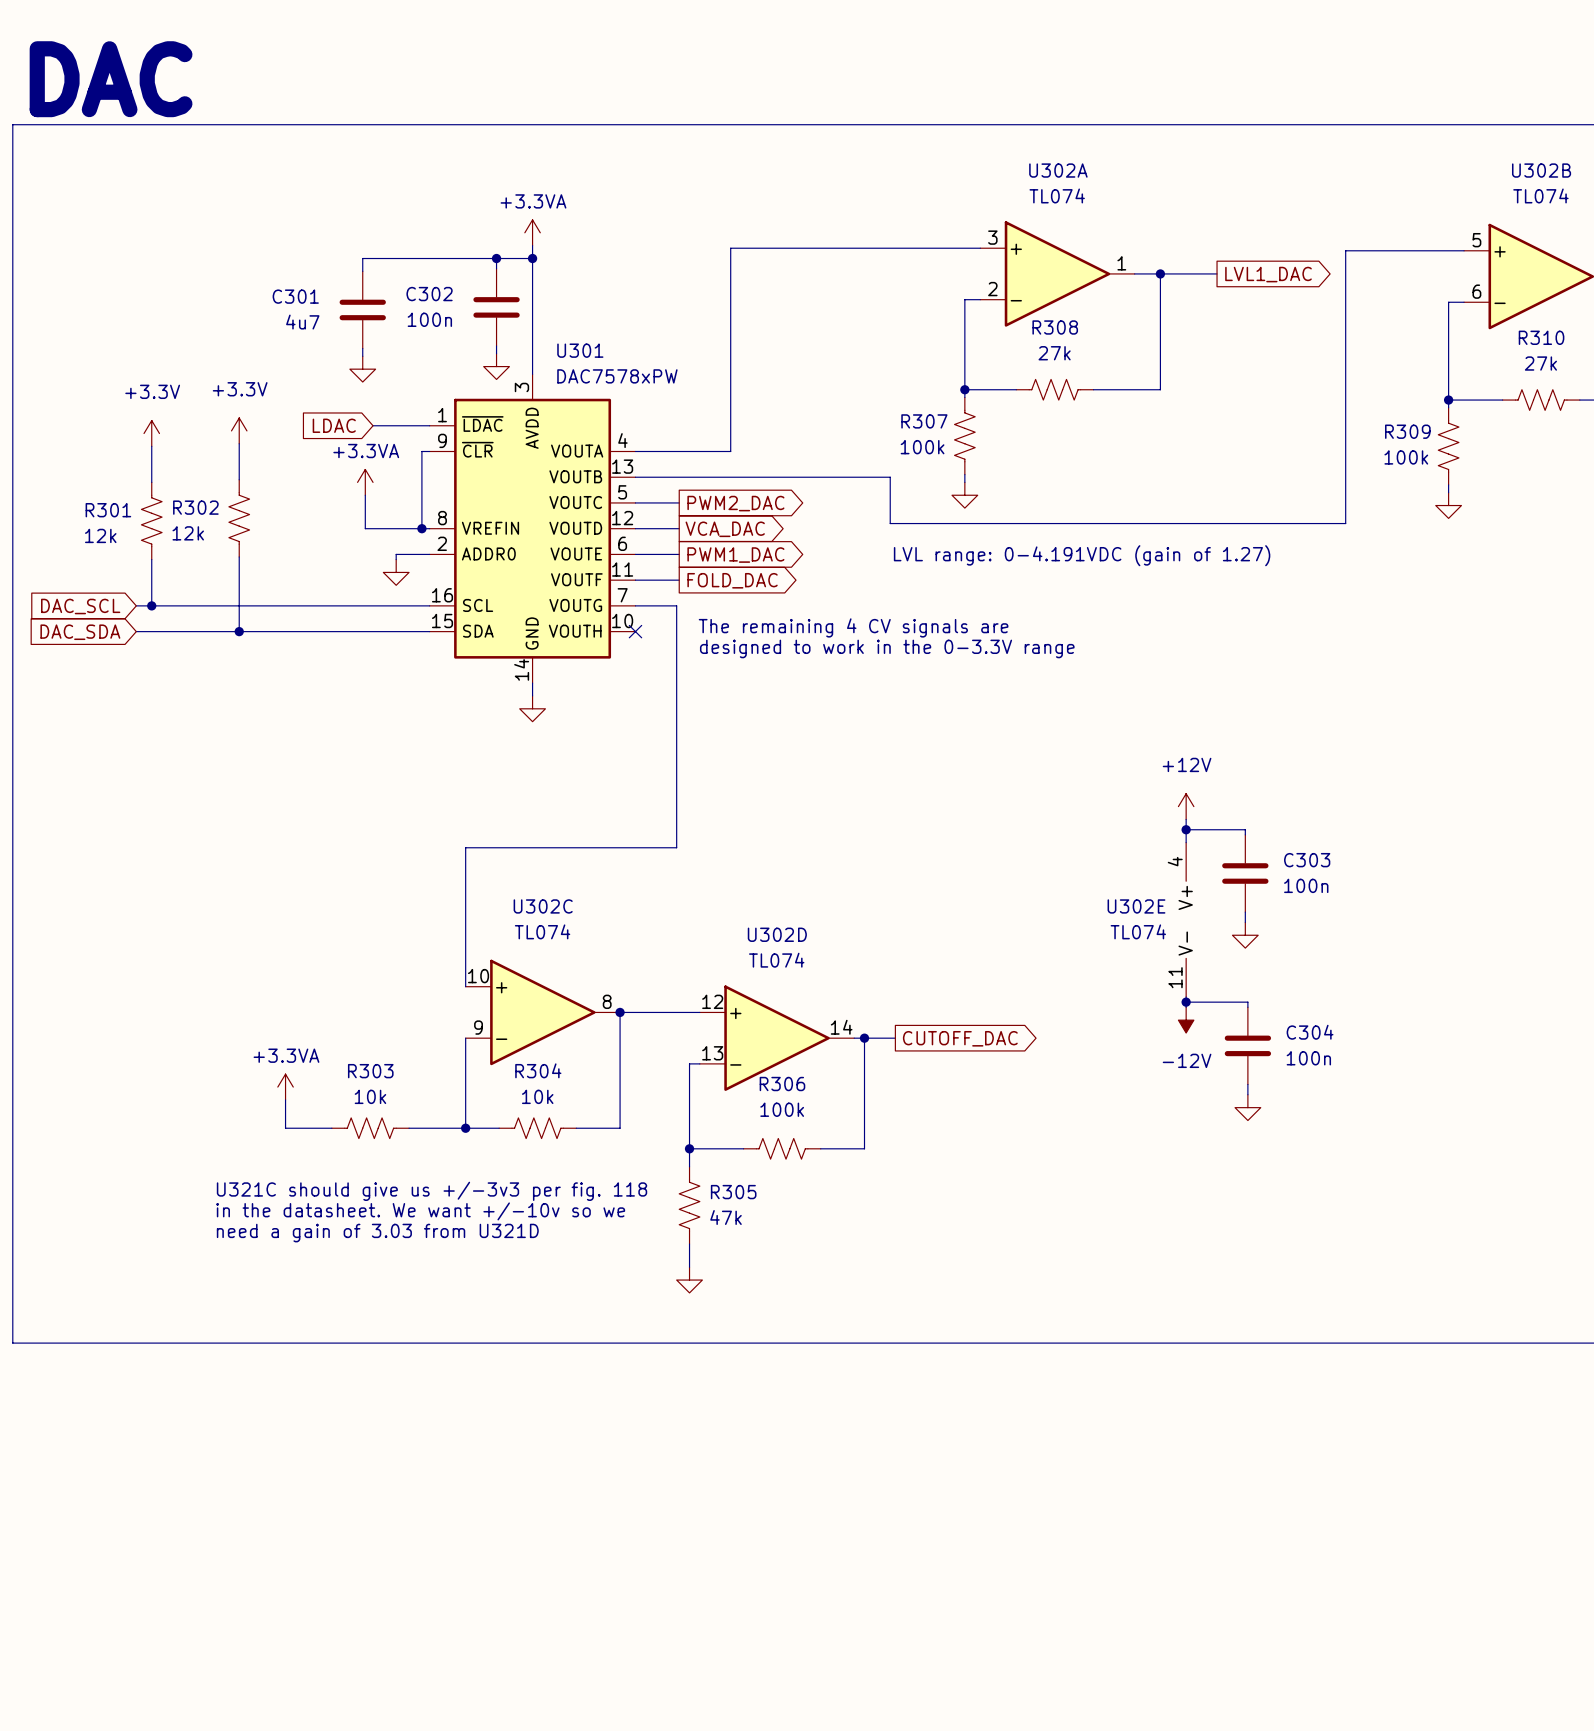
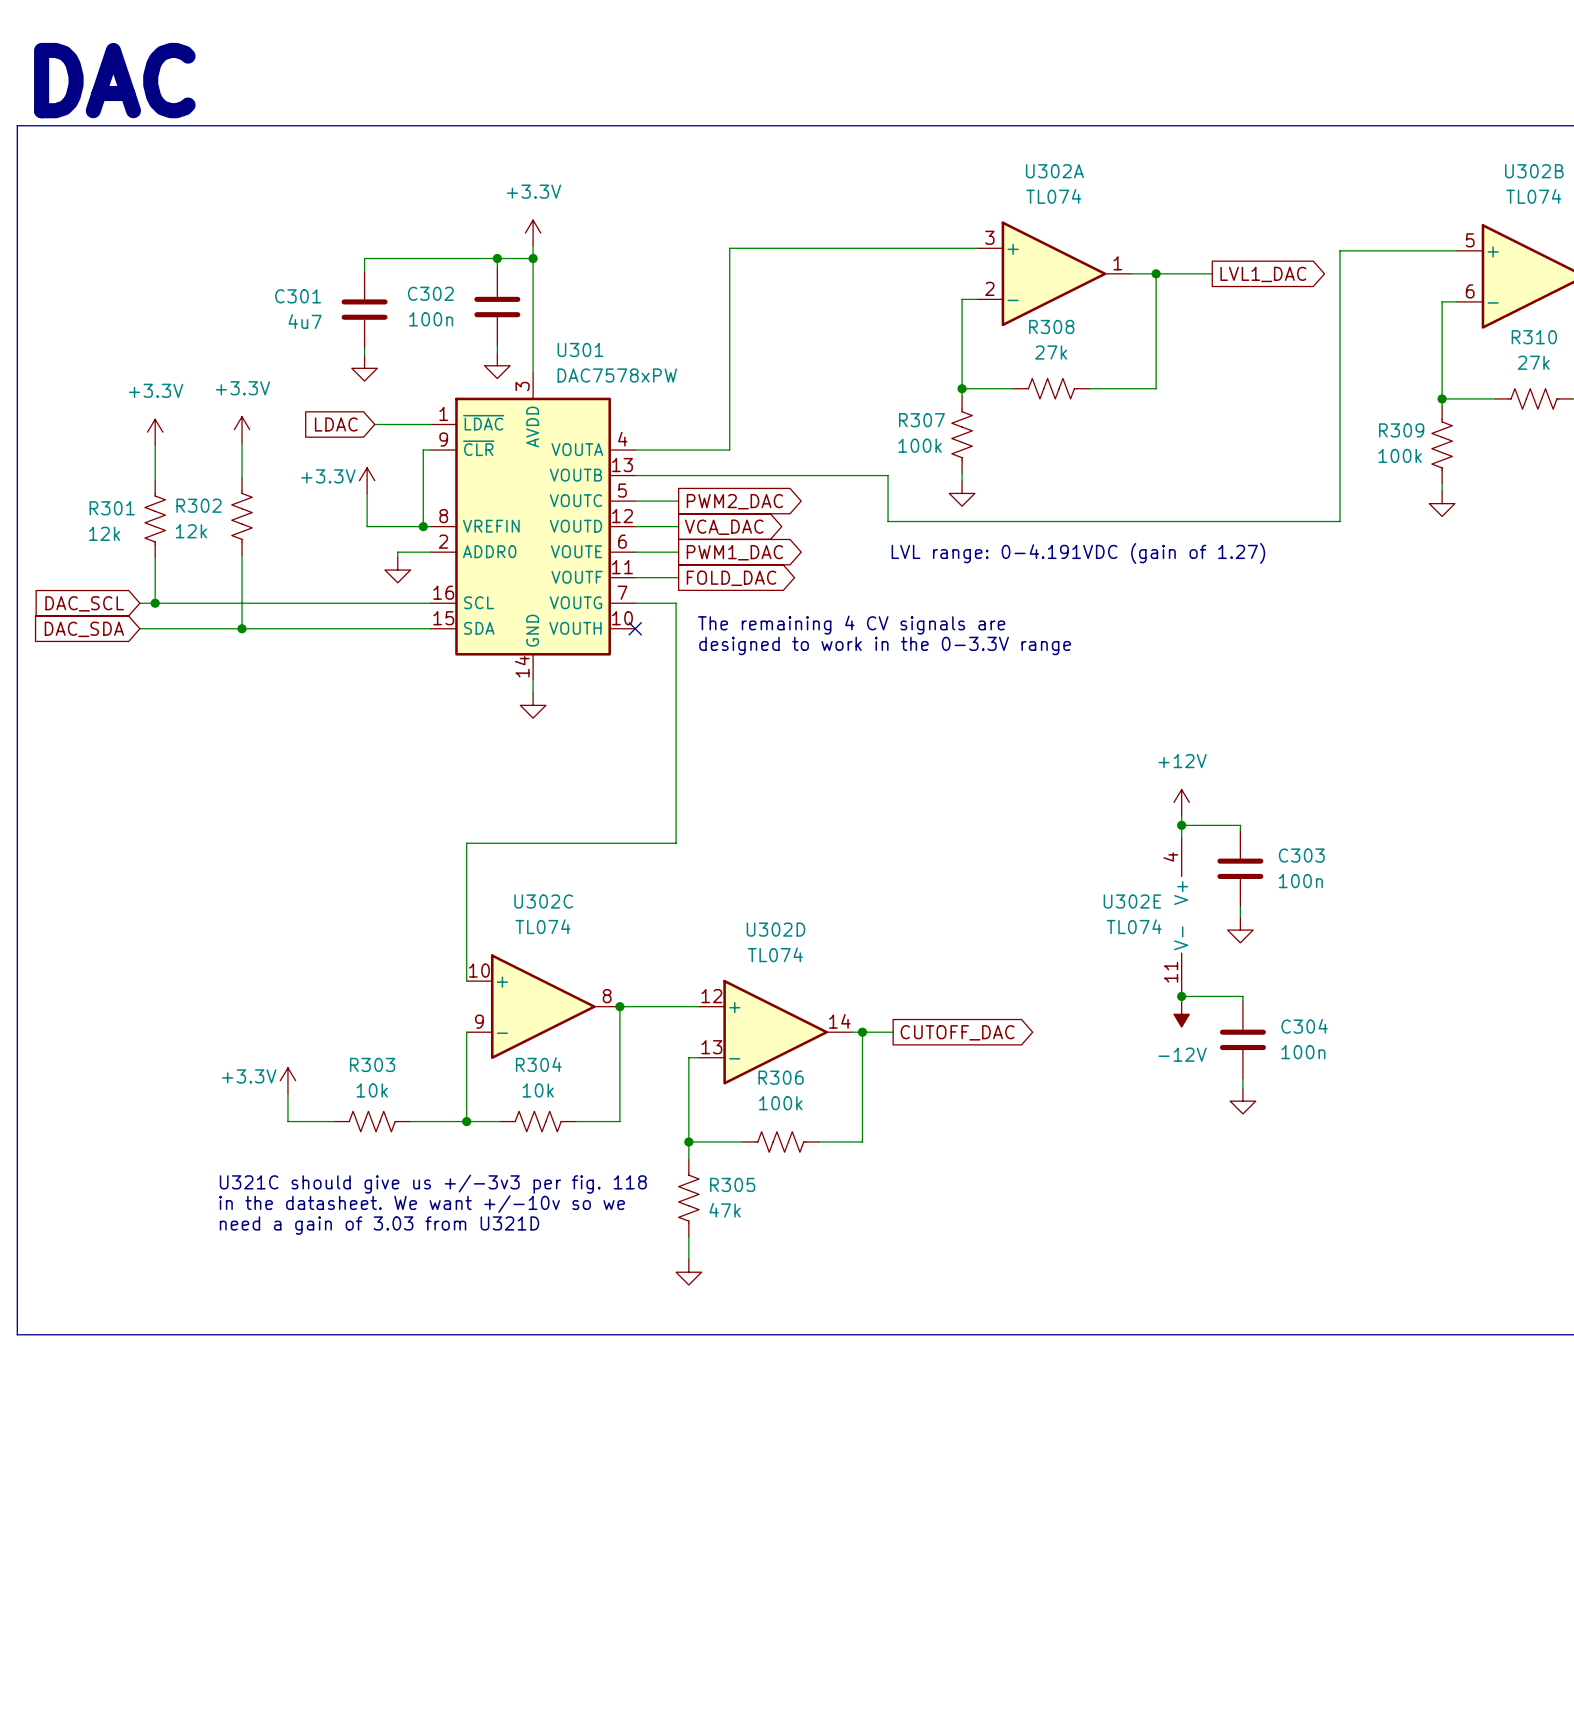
power symbol: +3.3VA (532, 232) -> +3.3V (533, 232)
power symbol: +3.3VA (365, 482) -> +3.3V (367, 480)
power symbol: +3.3VA (285, 1087) -> +3.3V (287, 1080)

